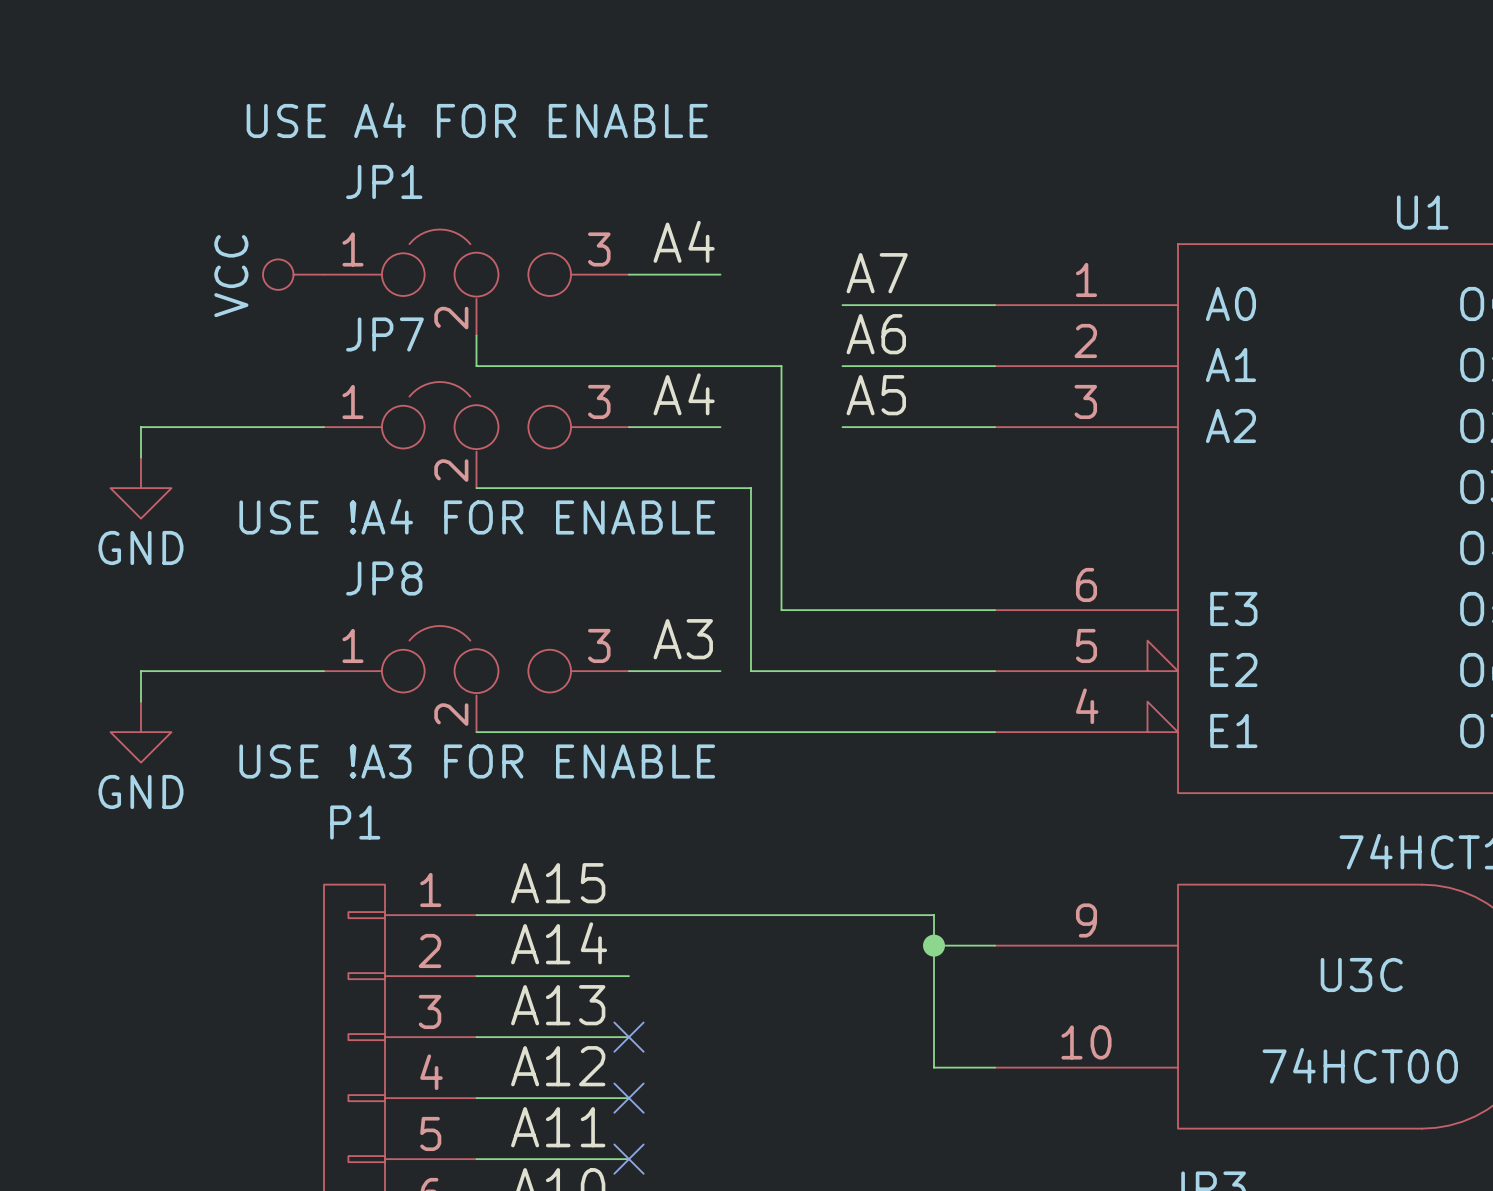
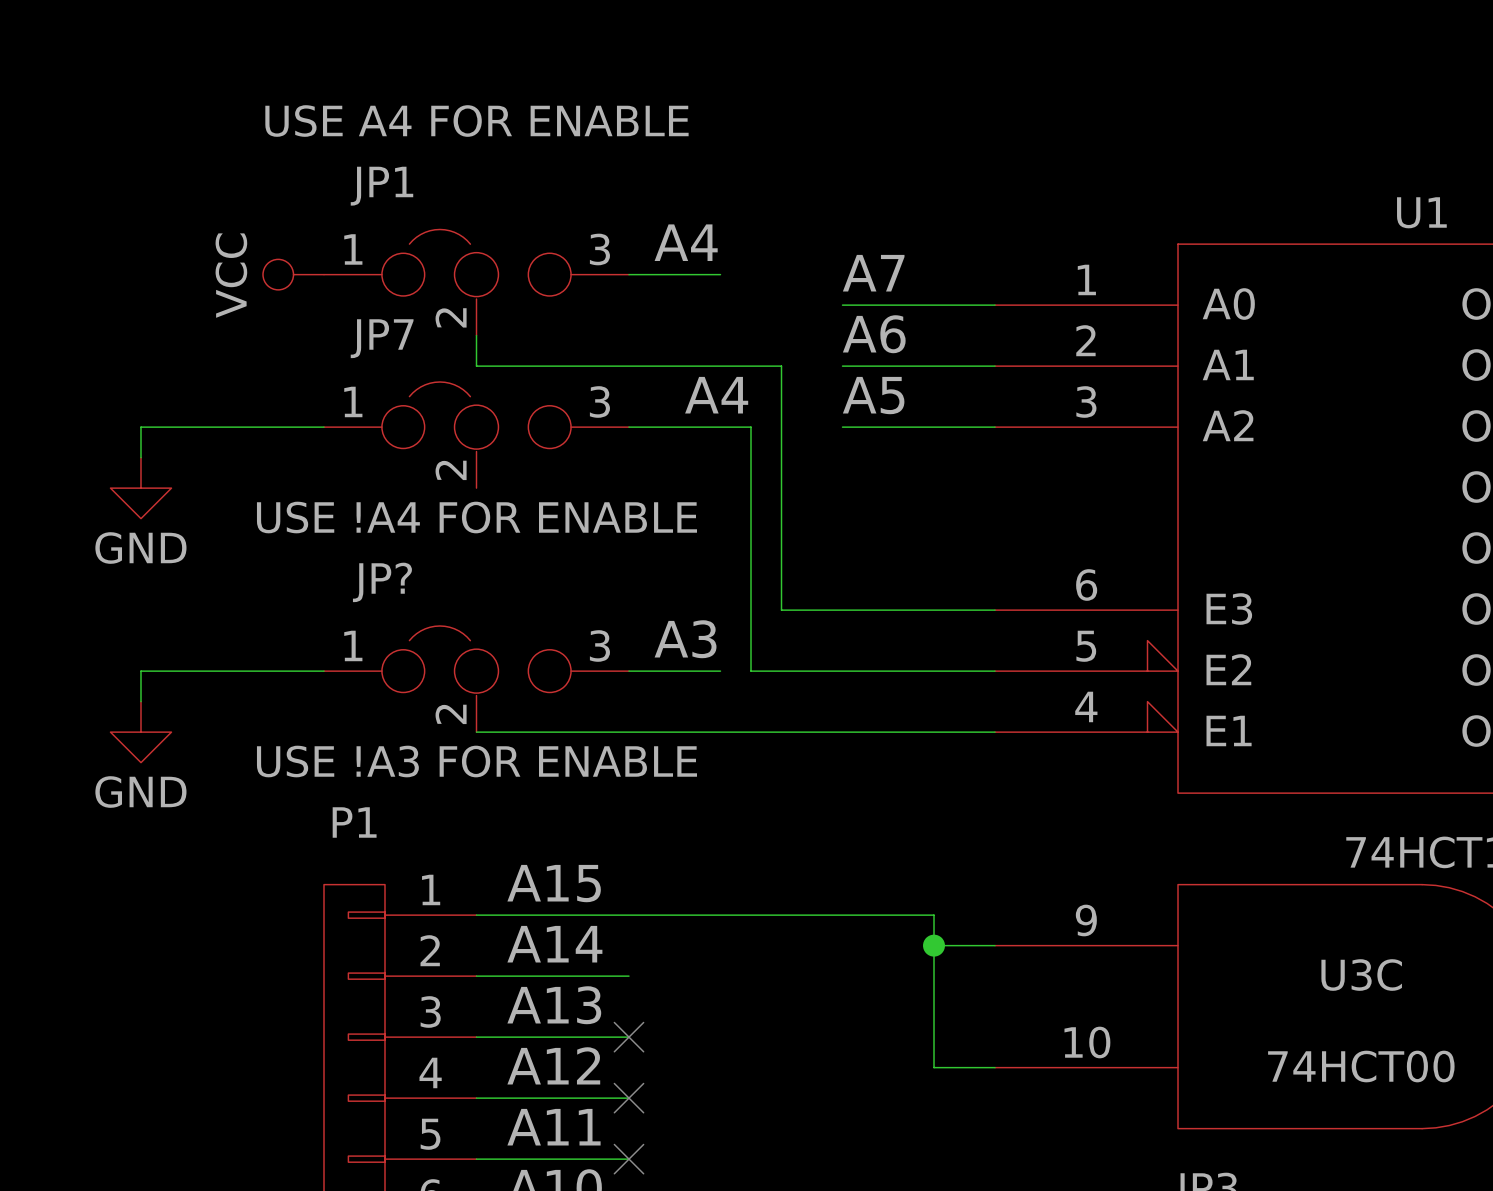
label position: A4 (684, 394) -> A4 (716, 395)
wire: (476, 488) (751, 488) -> (720, 427) (751, 427) (751, 488)
JP8 name: JP8 (384, 578) -> JP? (382, 582)

